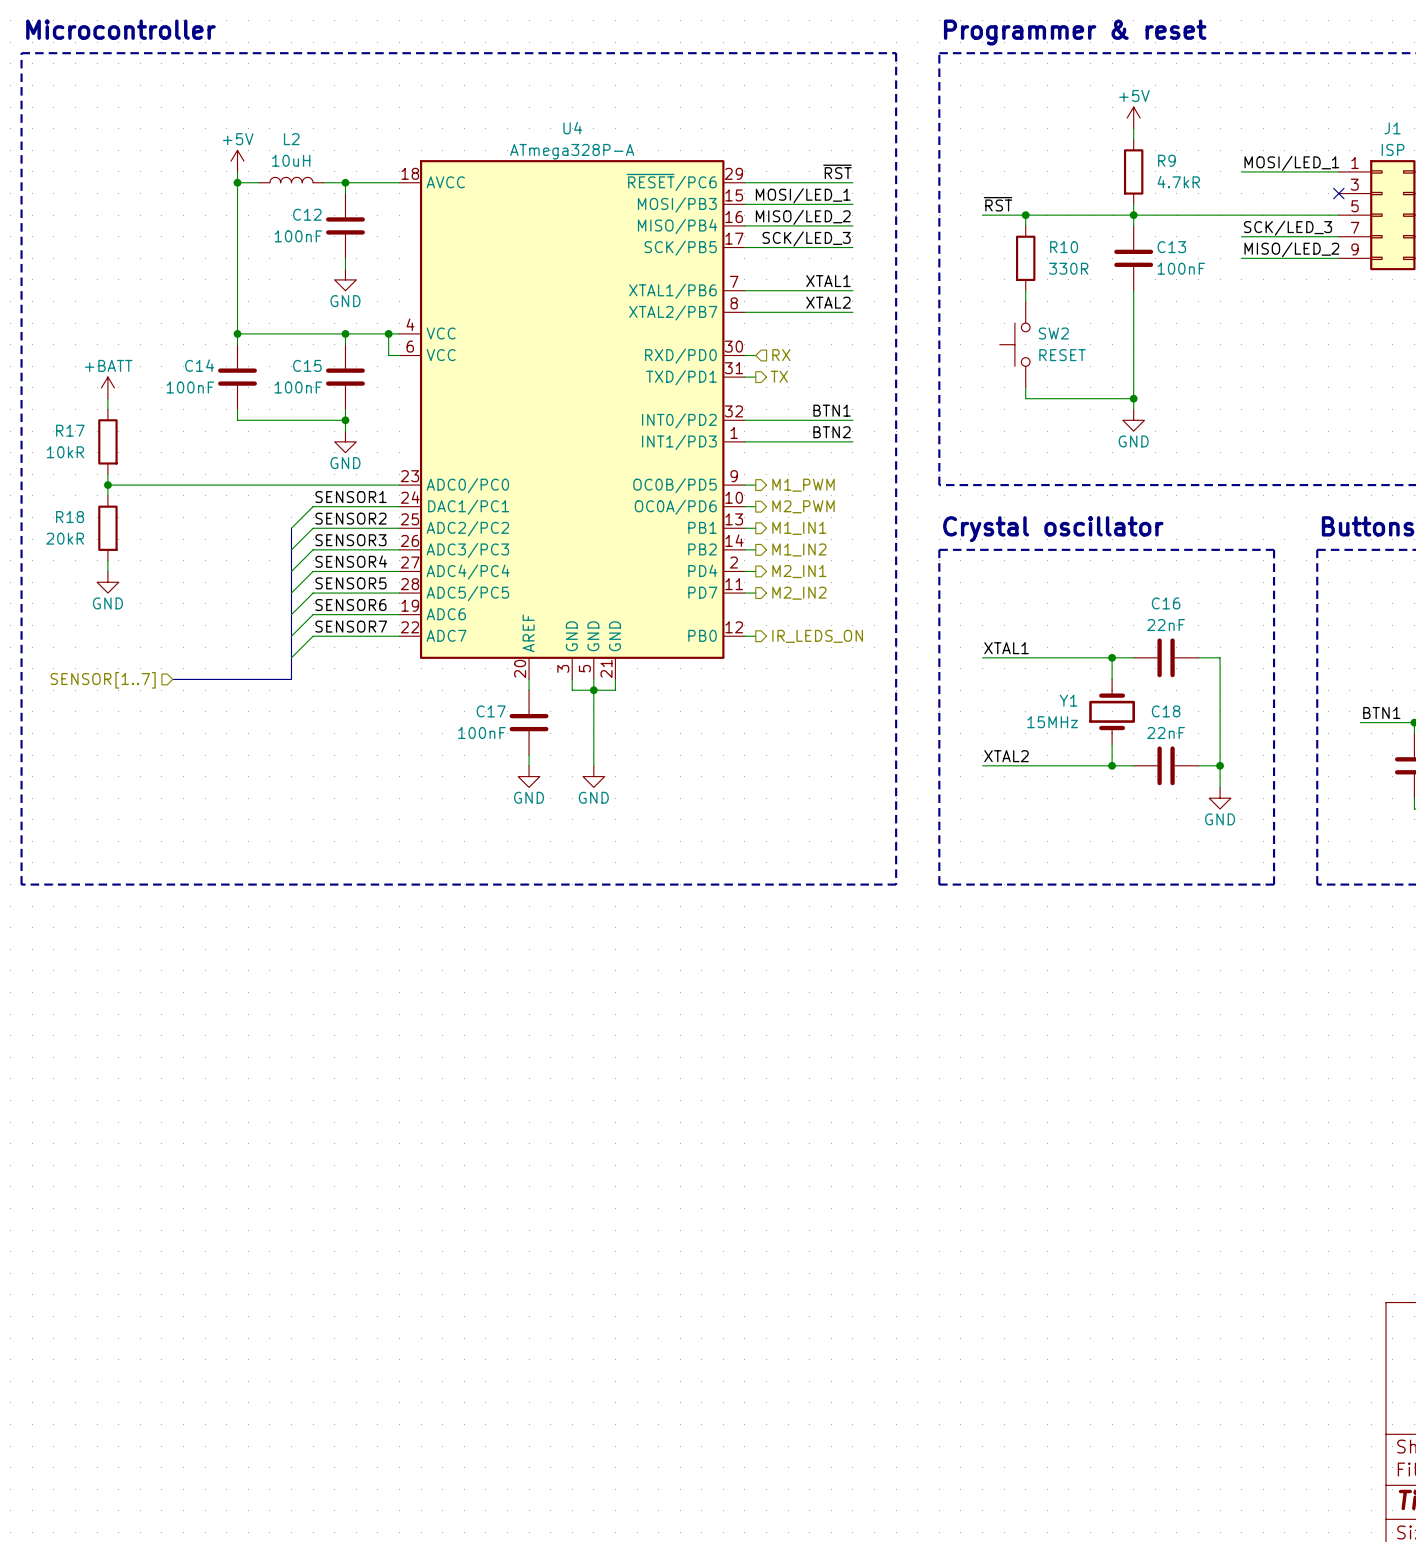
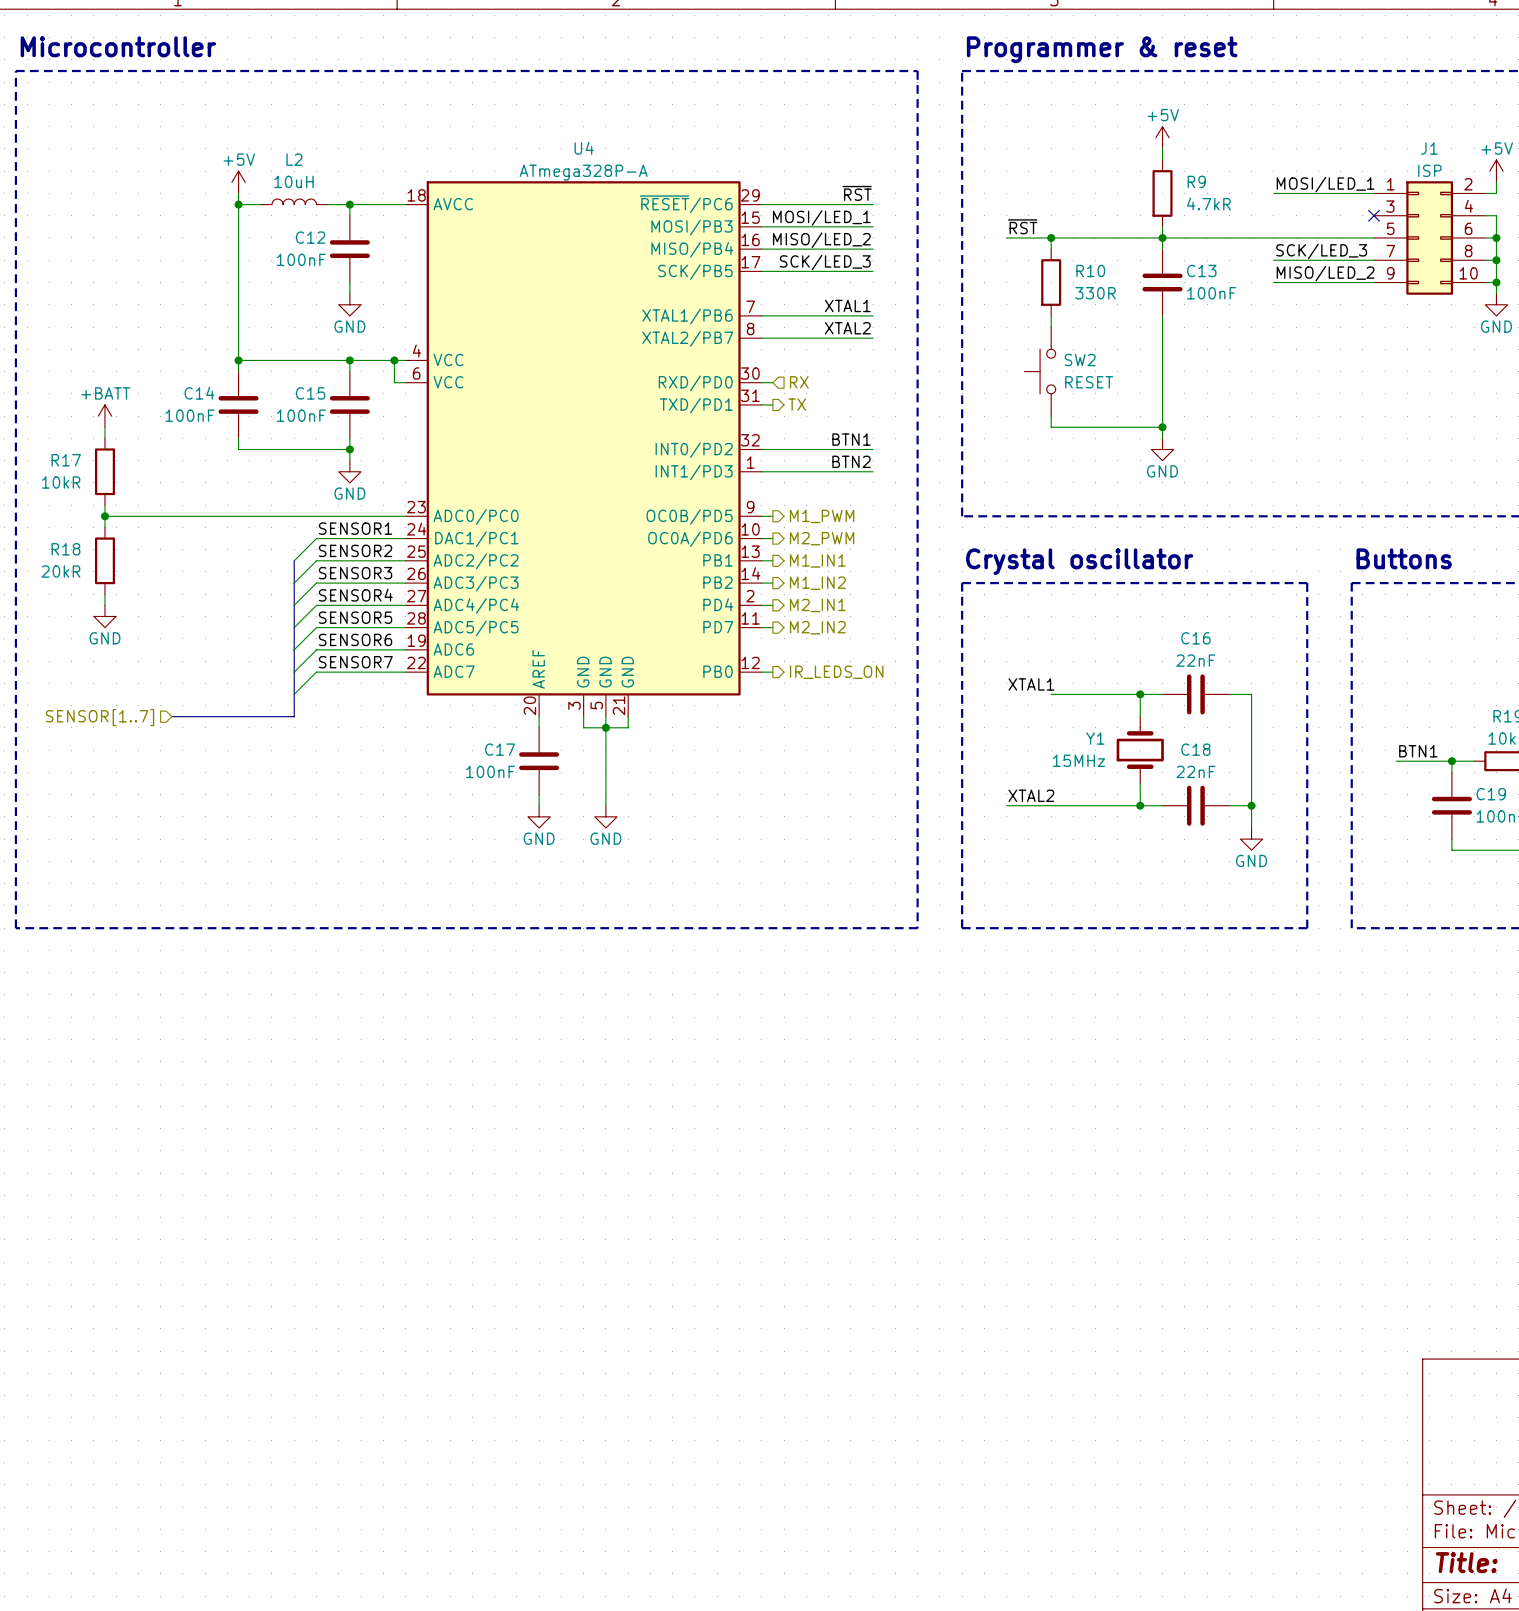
wire: (982, 657) (1025, 657) -> none

